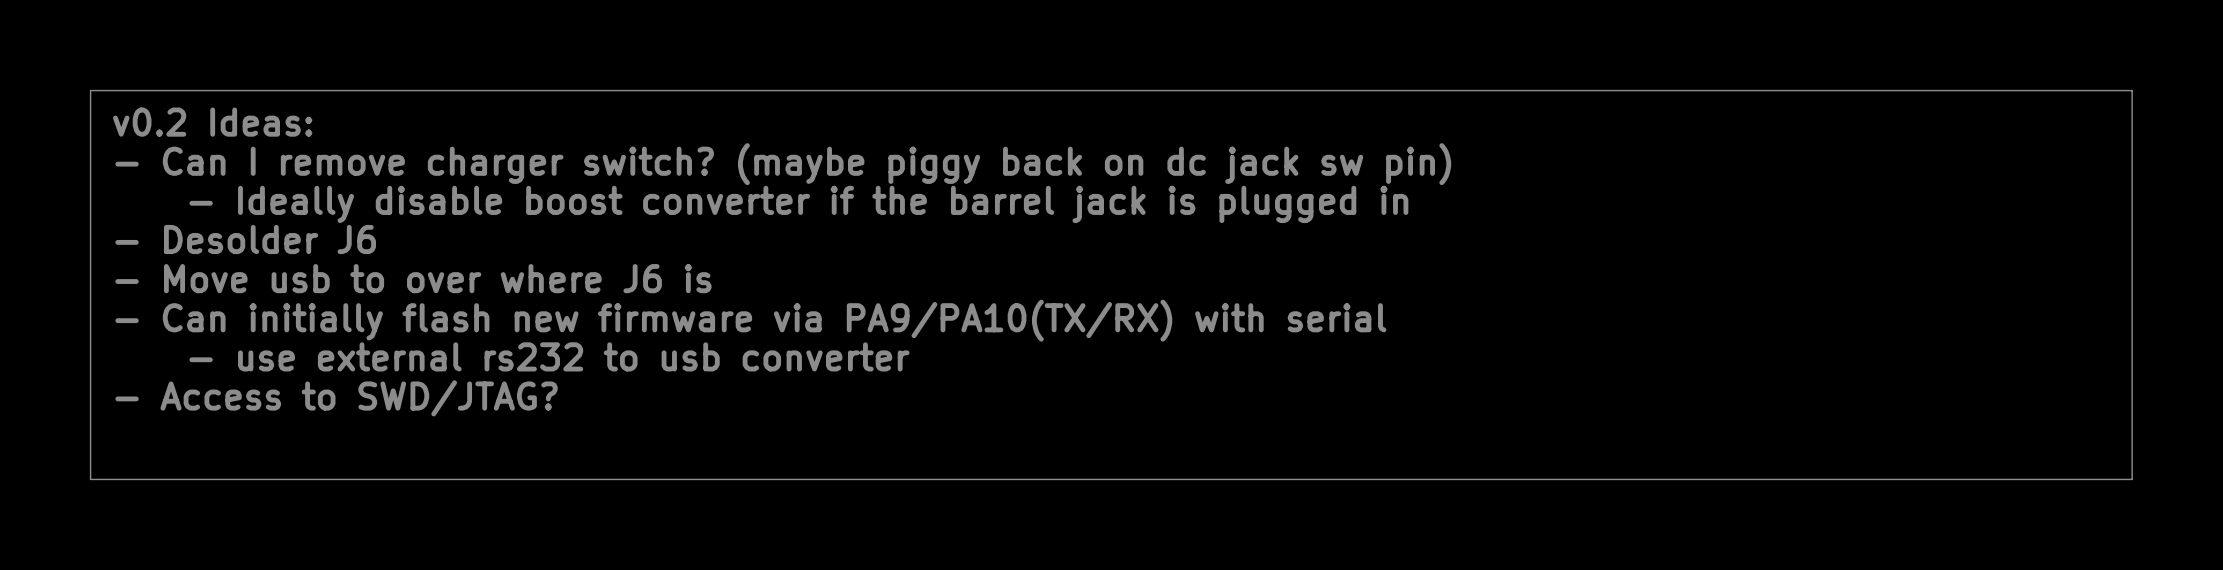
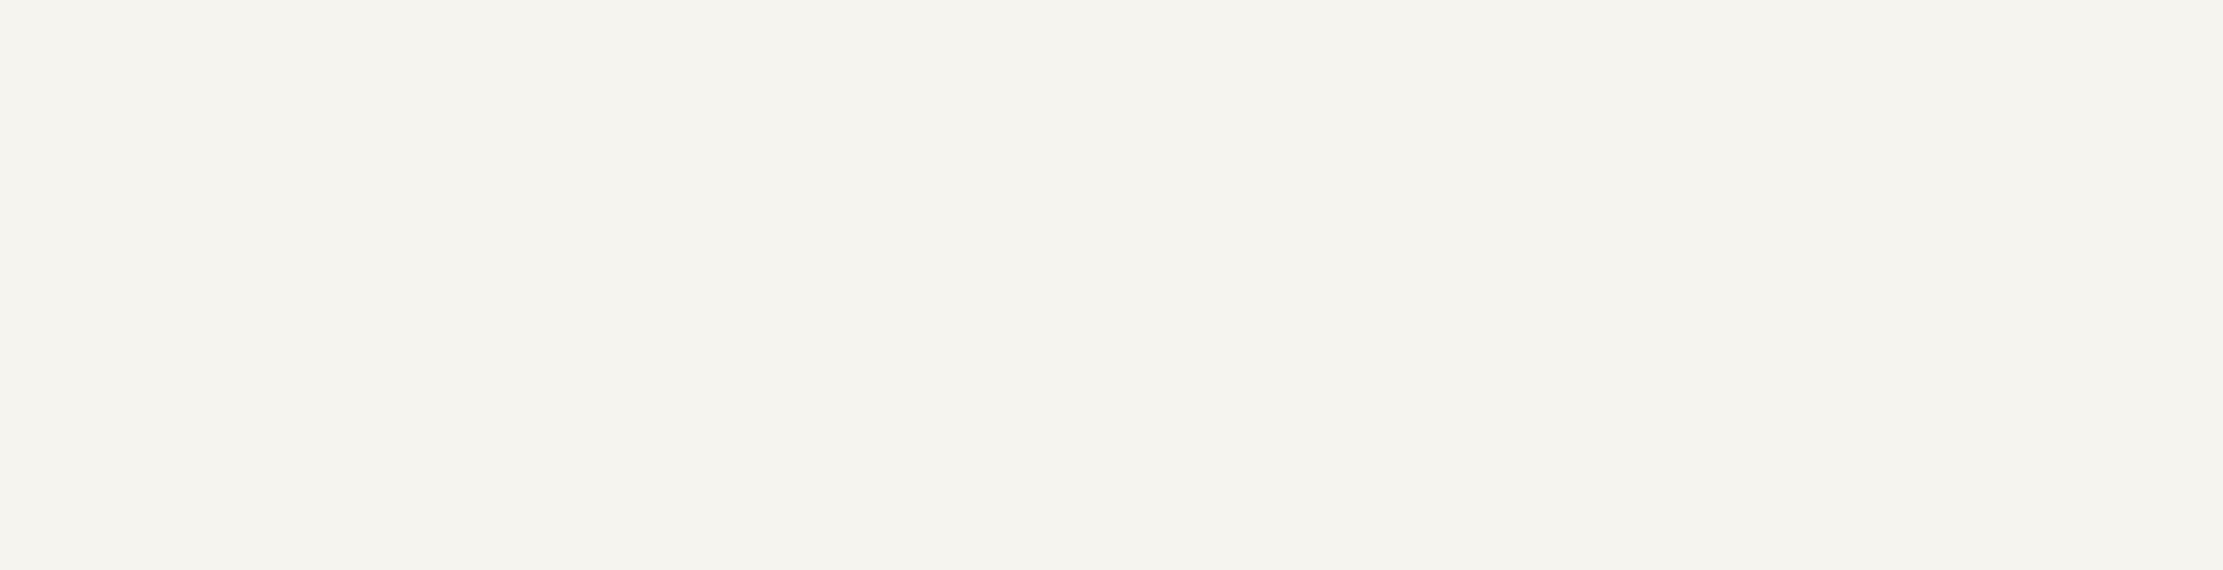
line: (90, 90) (2132, 90) (2132, 479) (90, 479) (90, 90) -> none
text: v0.2 Ideas: (212, 122) -> none
text: - Can I remove charger switch? (maybe piggy back on dc jack sw pin) (783, 164) -> none
text: - Ideally disable boost converter if the barrel jack is plugged in (798, 204) -> none
text: - Desolder J6 (245, 239) -> none
text: - Move usb to over where J6 is (413, 278) -> none
text: - Can initially flash new firmware via PA9/PA10(TX/RX) with serial (750, 320) -> none
text: - use external rs232 to usb converter (549, 356) -> none
text: - Access to SWD/JTAG? (336, 398) -> none

